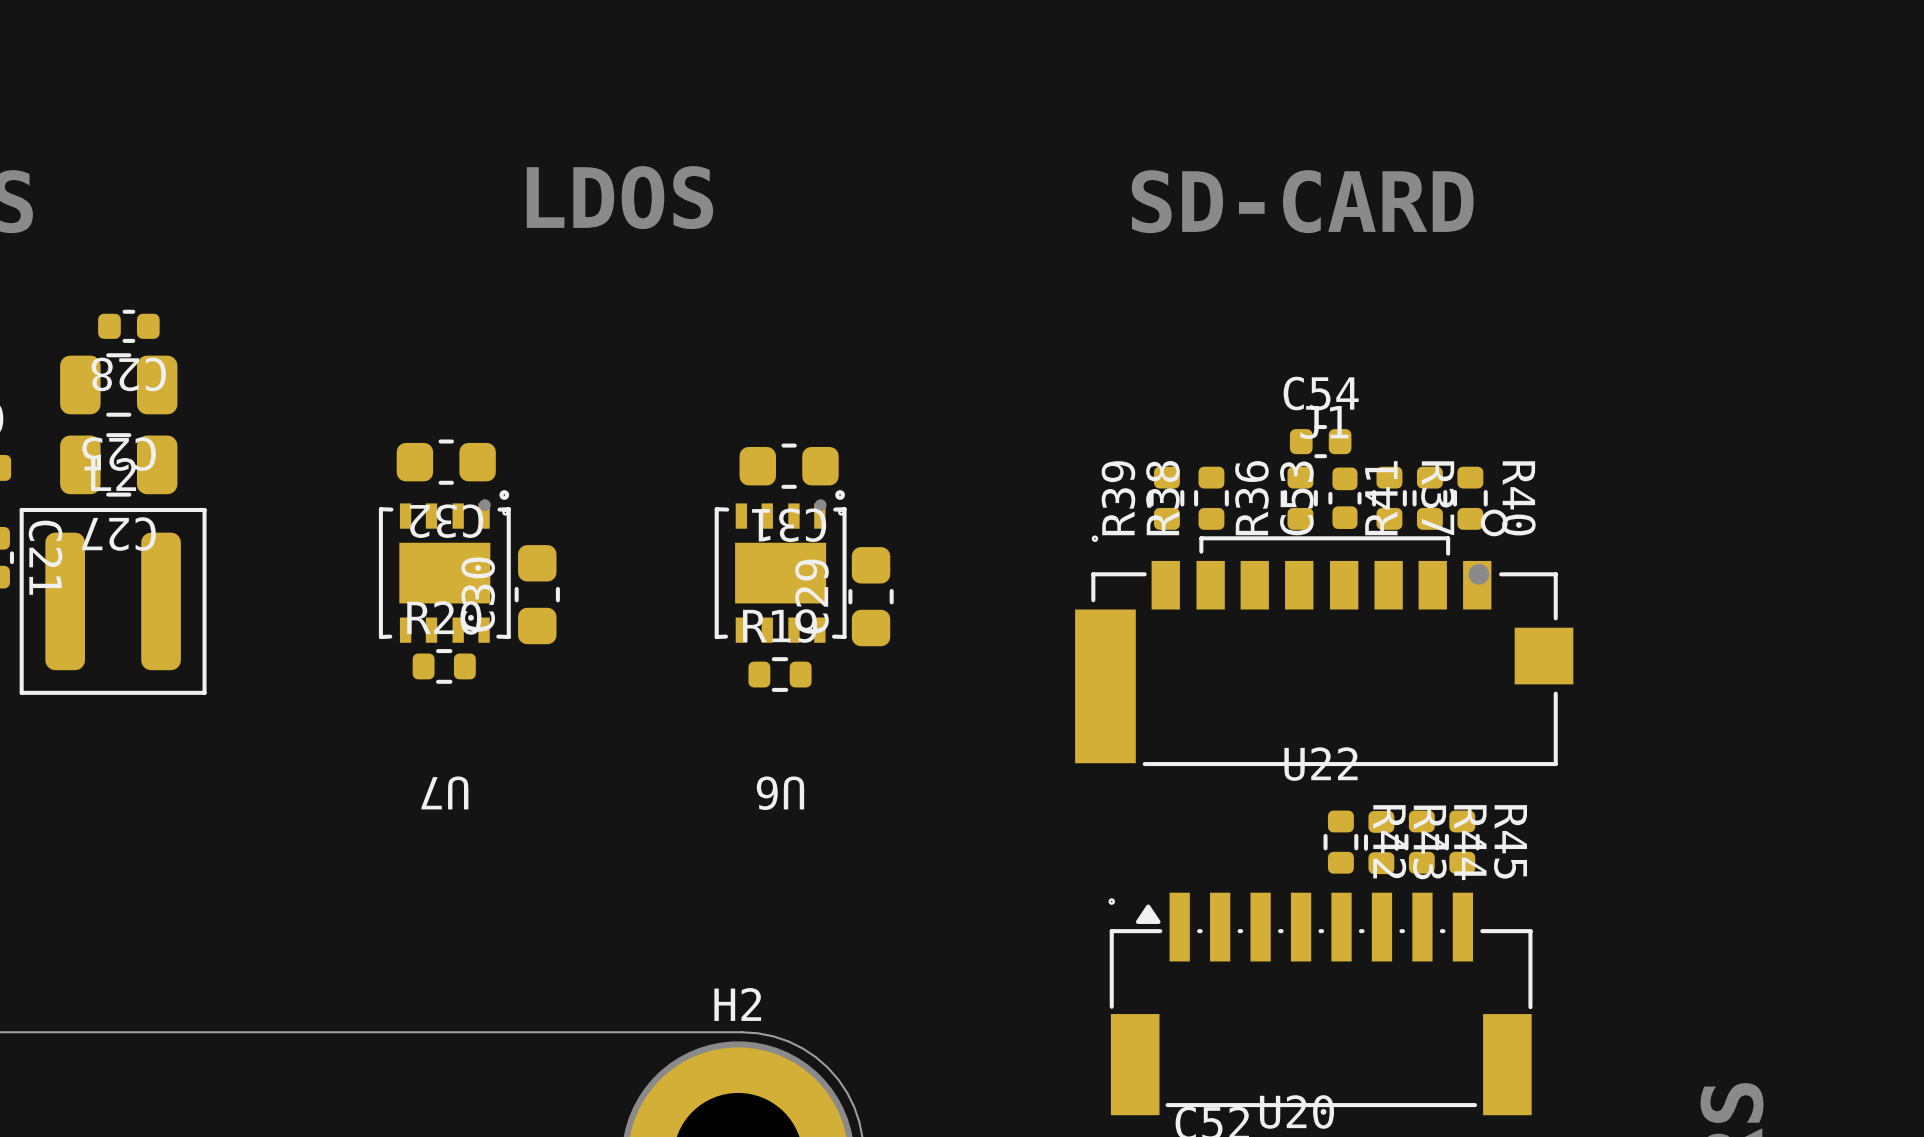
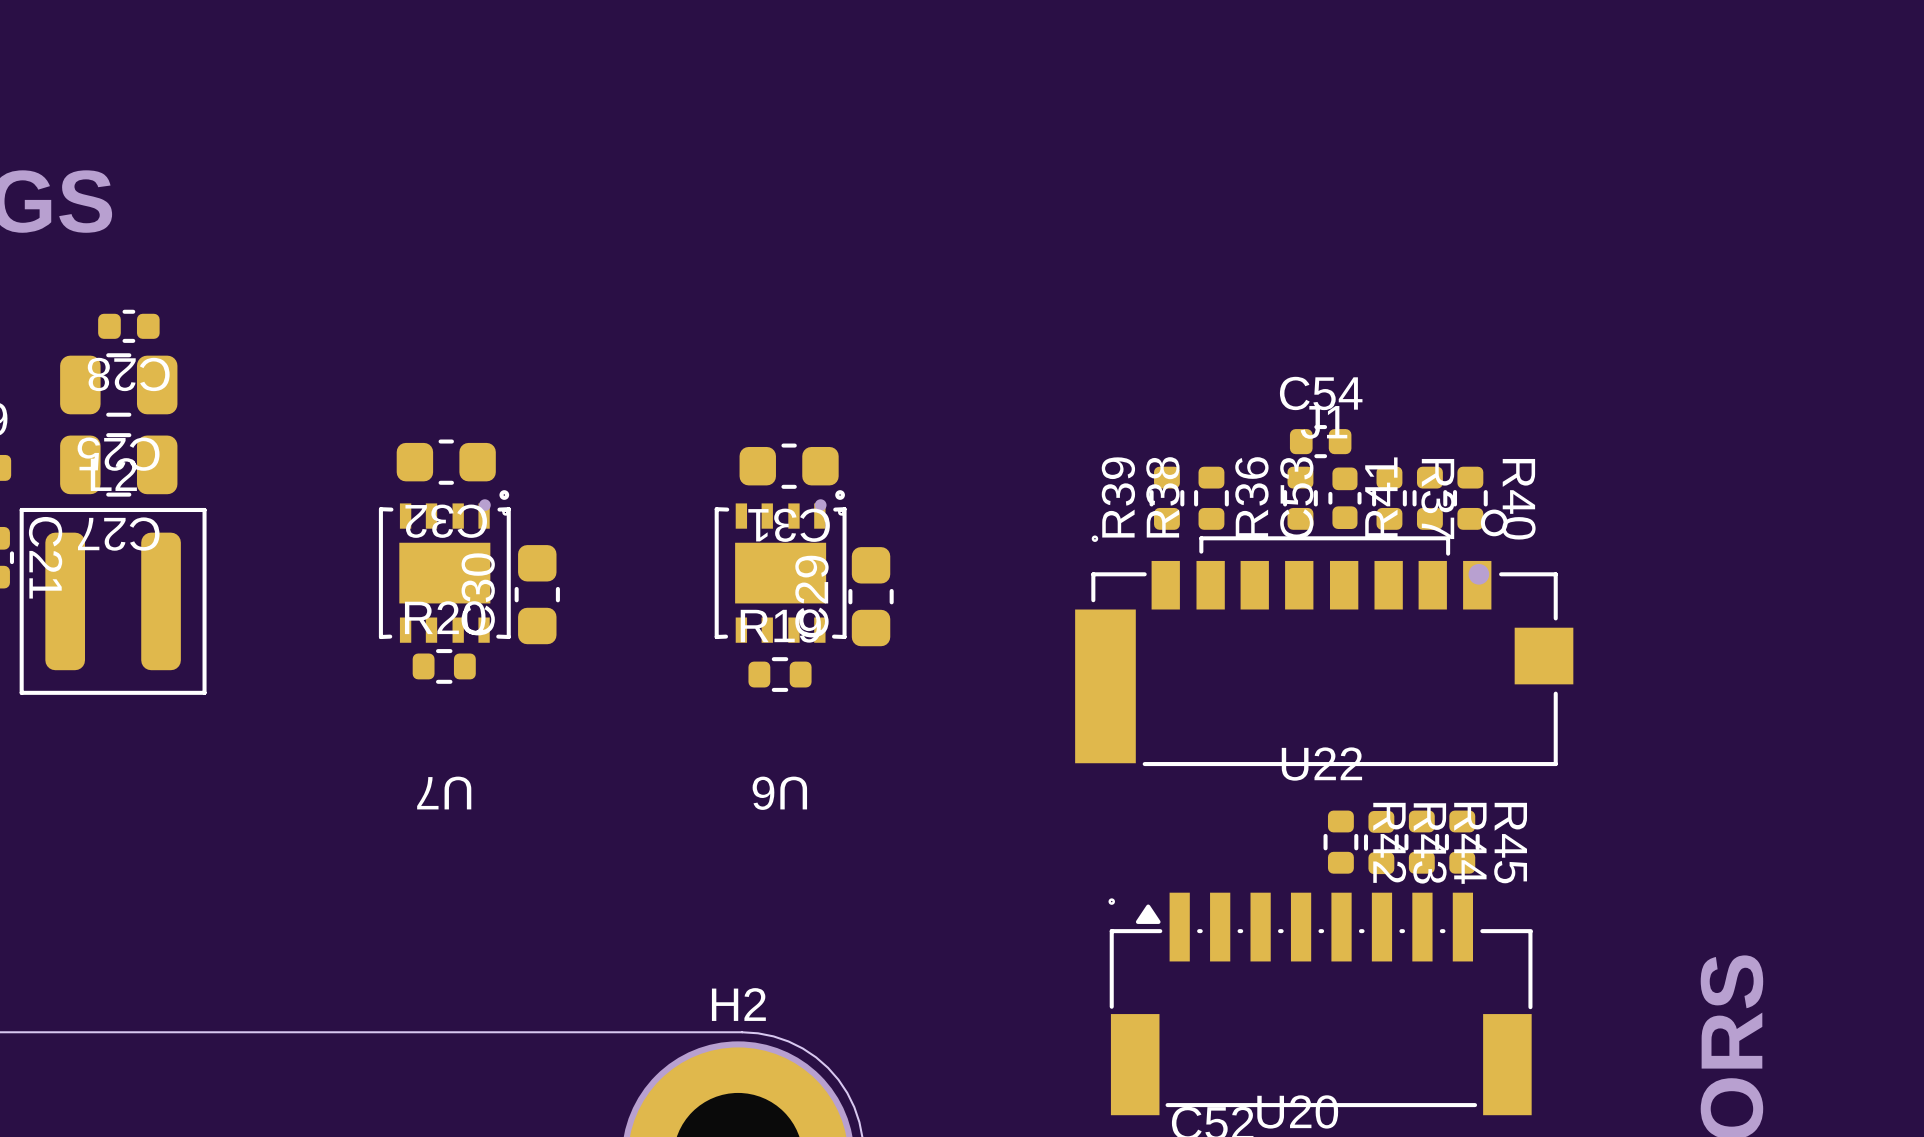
text: LDOS (619, 197) -> none
text: SD-CARD (1302, 201) -> none

